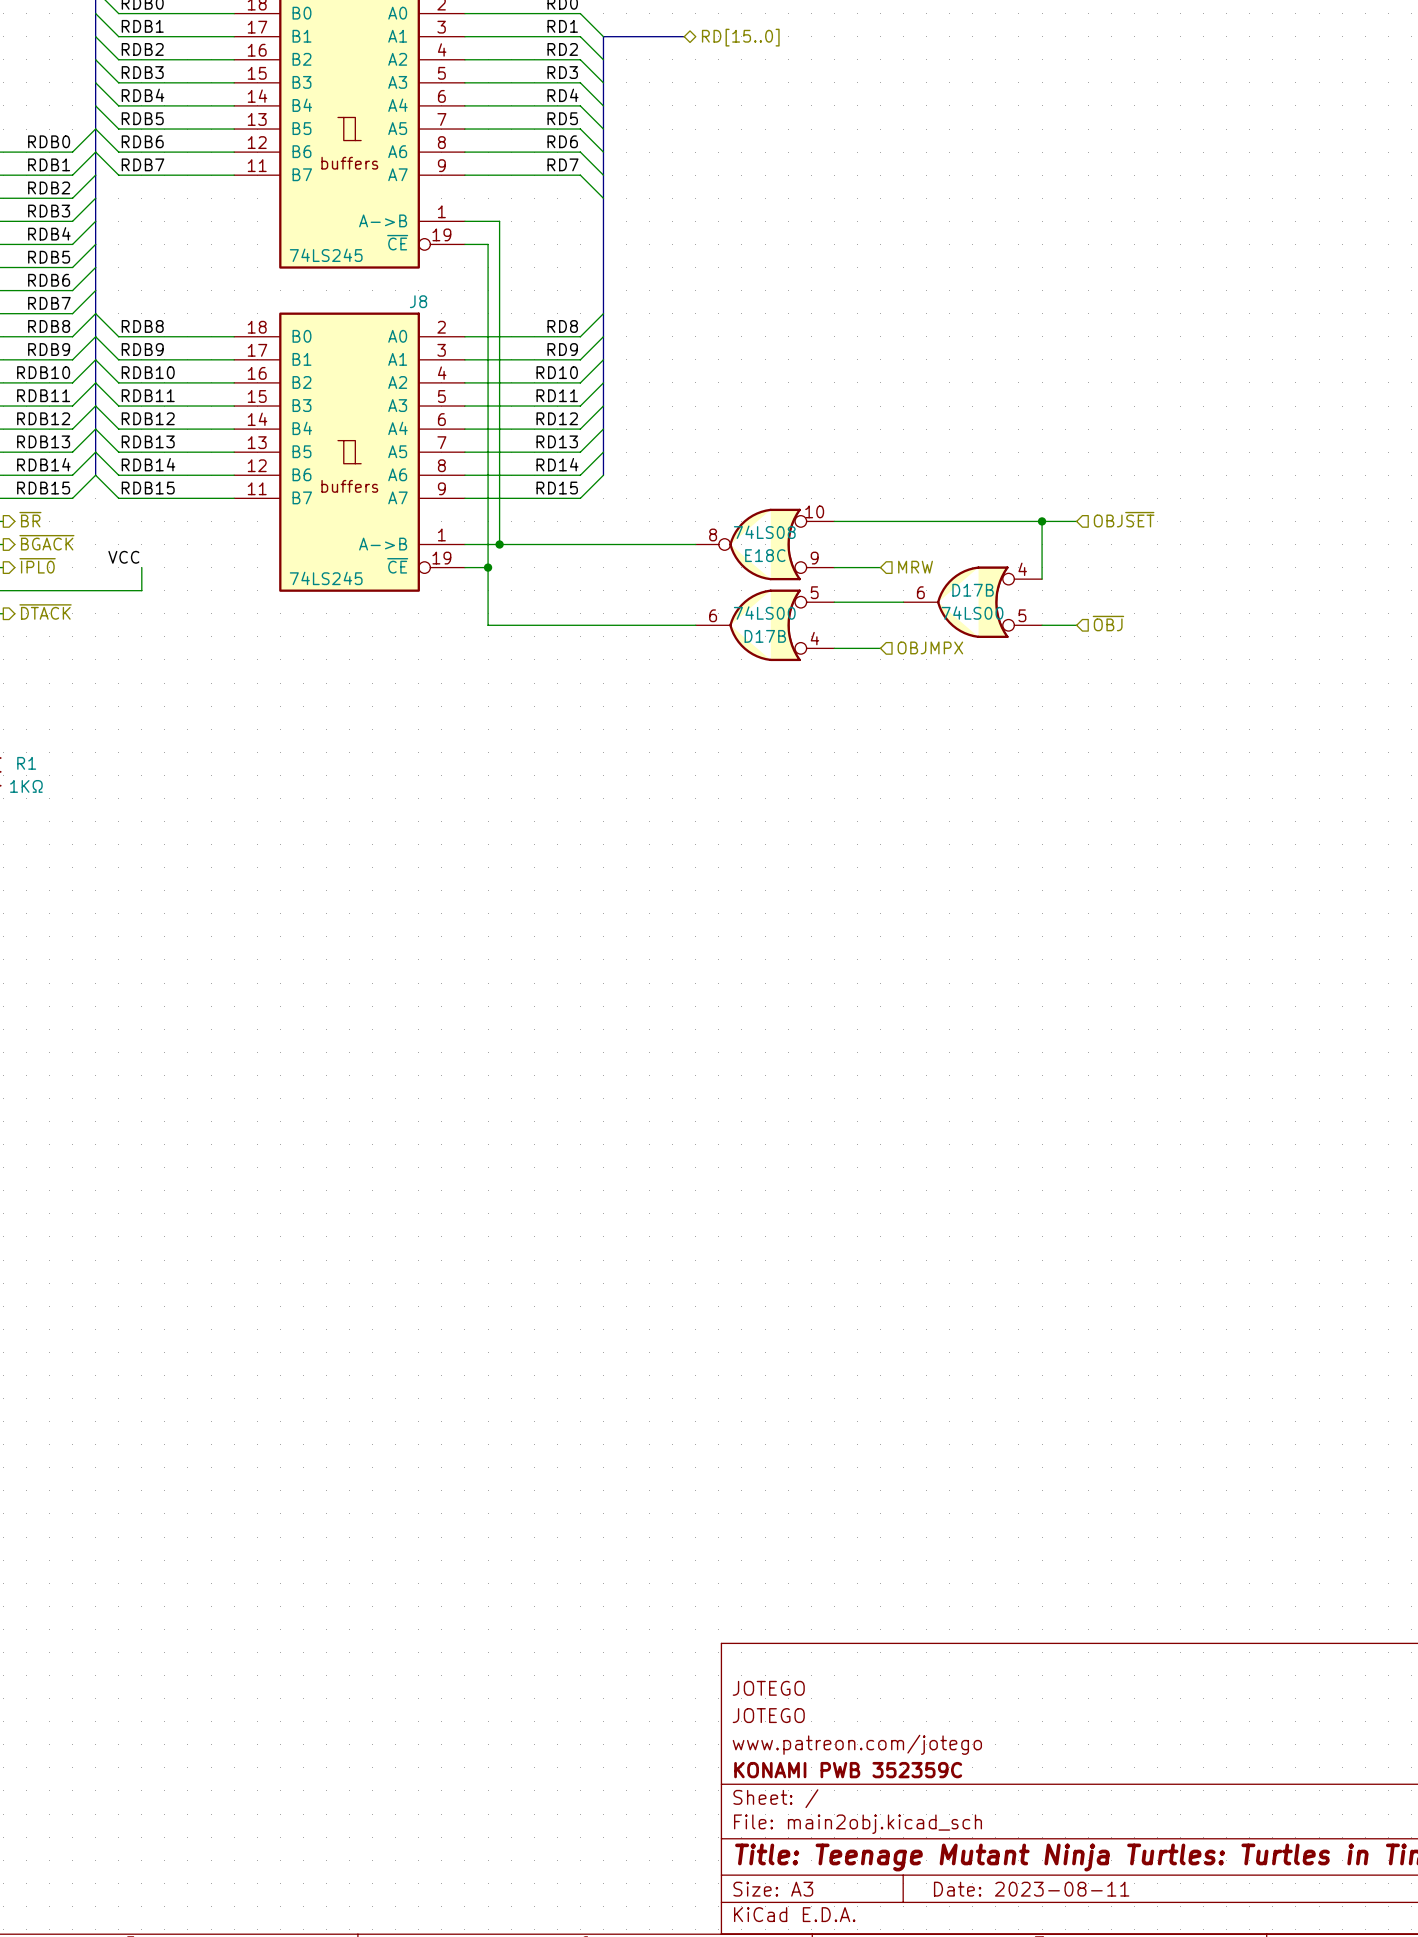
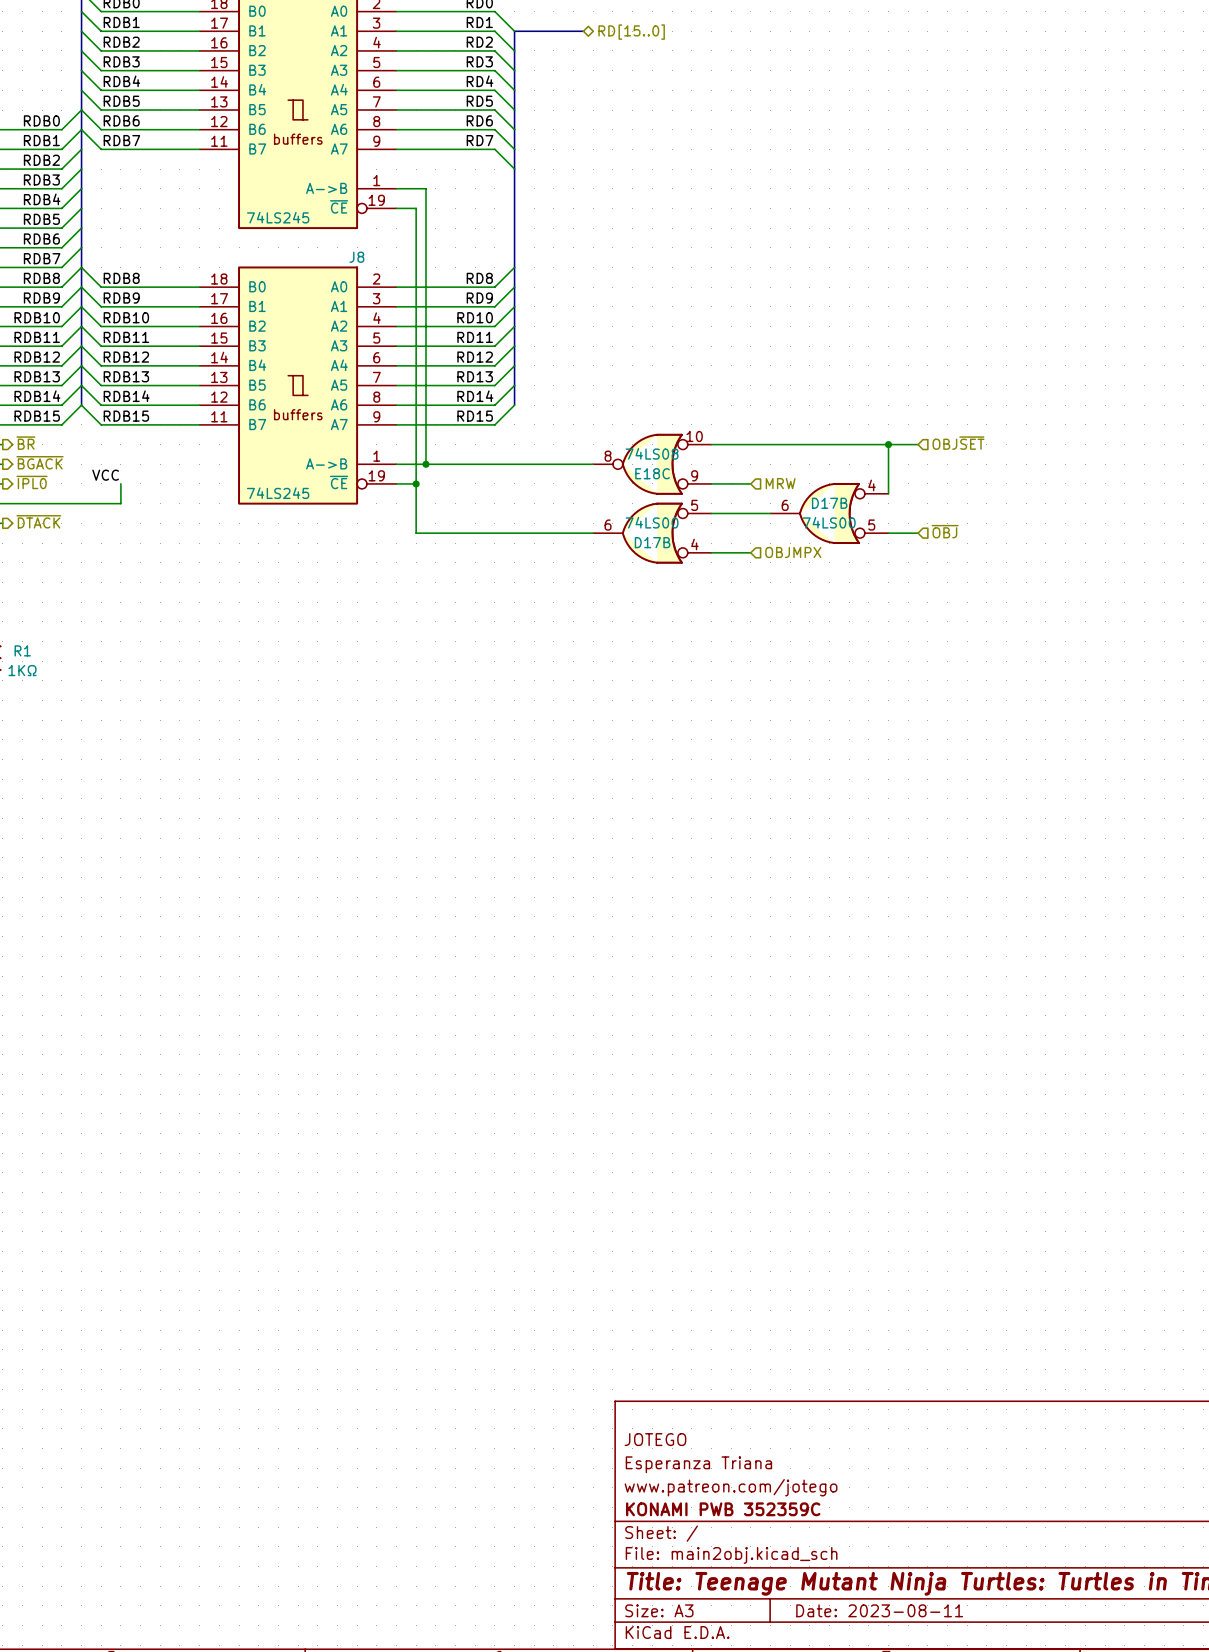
title block: JOTEGO (768, 1715) -> Esperanza Triana (698, 1464)

